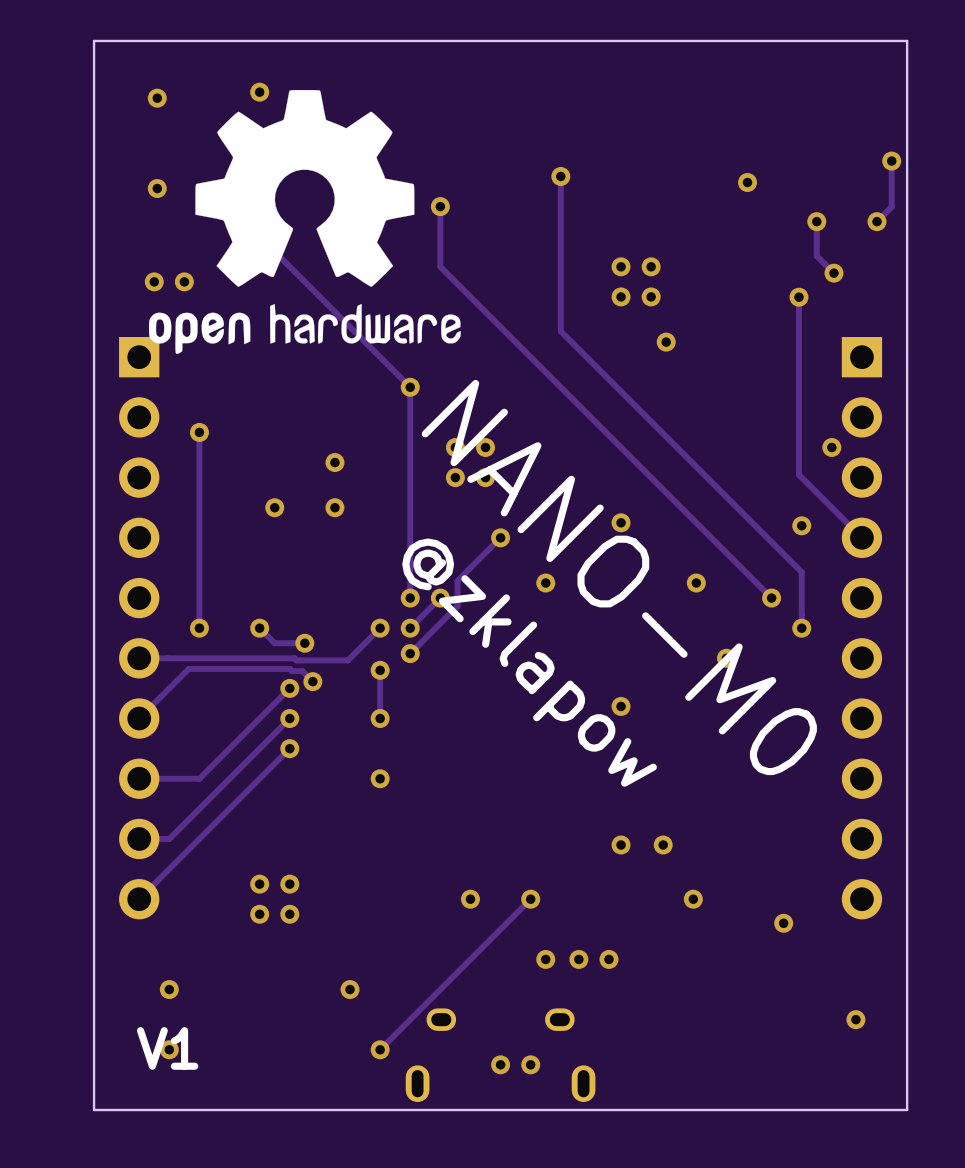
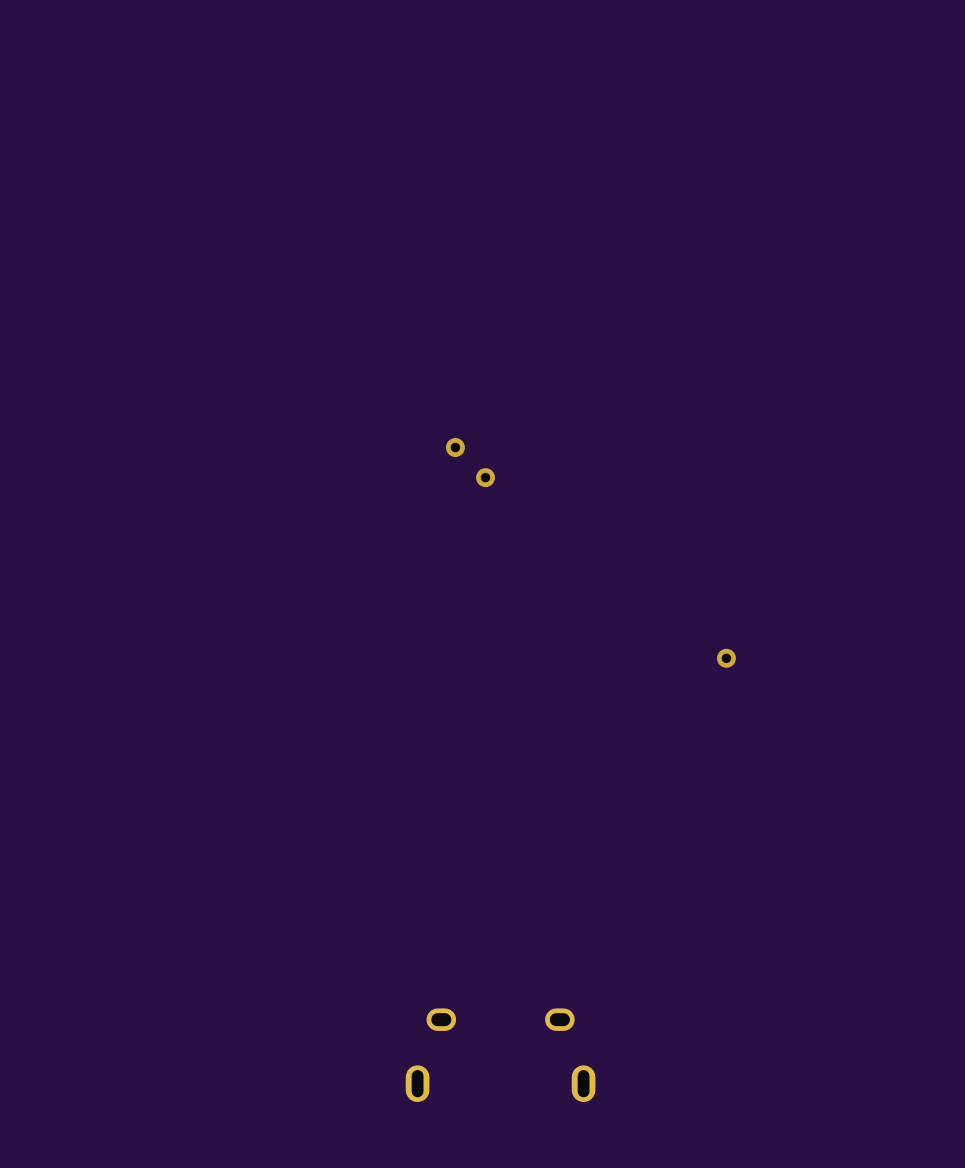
board edge: (907, 40) (94, 40) (94, 1110) (907, 1110) (907, 40) -> none
drawing: [148, 89, 461, 354] -> none
via: (259, 92) -> none
via: (157, 98) -> none
track: (891, 161) (891, 206) (877, 221) -> none
via: (891, 161) -> none
track: (560, 176) (560, 331) (801, 572) (801, 628) -> none
via: (560, 176) -> none
via: (747, 182) -> none
via: (157, 188) -> none
track: (440, 206) (440, 266) (771, 598) -> none
via: (440, 206) -> none
track: (816, 221) (816, 255) (833, 273) -> none
via: (816, 221) -> none
via: (877, 221) -> none
track: (259, 236) (410, 387) (410, 598) -> none
via: (621, 266) -> none
via: (651, 266) -> none
via: (833, 273) -> none
via: (154, 281) -> none
via: (184, 281) -> none
via: (621, 296) -> none
via: (651, 296) -> none
track: (798, 297) (798, 474) (861, 537) -> none
via: (798, 297) -> none
via: (666, 342) -> none
via: (410, 387) -> none
track: (199, 432) (199, 628) -> none
via: (199, 432) -> none
via: (485, 447) -> none
via: (831, 447) -> none
via: (334, 462) -> none
via: (455, 477) -> none
via: (274, 507) -> none
via: (334, 507) -> none
via: (621, 522) -> none
via: (801, 525) -> none
track: (500, 537) (457, 580) (457, 606) (410, 653) -> none
via: (500, 537) -> none
text: NANO-M0 (619, 577) -> none
via: (545, 583) -> none
via: (696, 583) -> none
via: (410, 598) -> none
track: (440, 598) (410, 628) -> none
via: (440, 598) -> none
via: (771, 598) -> none
part: (139, 628) -> none
via: (199, 628) -> none
track: (259, 628) (274, 643) (304, 643) -> none
via: (259, 628) -> none
track: (380, 628) (347, 660) (296, 660) (294, 658) (139, 658) -> none
via: (380, 628) -> none
via: (410, 628) -> none
via: (801, 628) -> none
part: (861, 628) -> none
via: (304, 643) -> none
via: (410, 653) -> none
text: @zklapow (529, 662) -> none
track: (380, 670) (380, 718) -> none
via: (380, 670) -> none
track: (312, 681) (302, 671) (292, 671) (290, 668) (188, 668) (139, 718) -> none
via: (312, 681) -> none
track: (289, 688) (199, 778) (139, 778) -> none
via: (289, 688) -> none
via: (621, 706) -> none
track: (289, 718) (169, 838) (139, 838) -> none
via: (289, 718) -> none
via: (380, 718) -> none
track: (289, 748) (139, 899) -> none
via: (289, 748) -> none
via: (380, 778) -> none
via: (621, 845) -> none
via: (663, 845) -> none
via: (259, 884) -> none
via: (289, 884) -> none
via: (470, 899) -> none
track: (530, 899) (380, 1049) -> none
via: (530, 899) -> none
via: (693, 899) -> none
via: (259, 914) -> none
via: (289, 914) -> none
via: (783, 923) -> none
via: (545, 959) -> none
via: (578, 959) -> none
via: (609, 959) -> none
via: (169, 989) -> none
via: (350, 989) -> none
via: (855, 1019) -> none
text: V1 (167, 1048) -> none
via: (169, 1049) -> none
via: (380, 1049) -> none
via: (500, 1064) -> none
via: (530, 1064) -> none

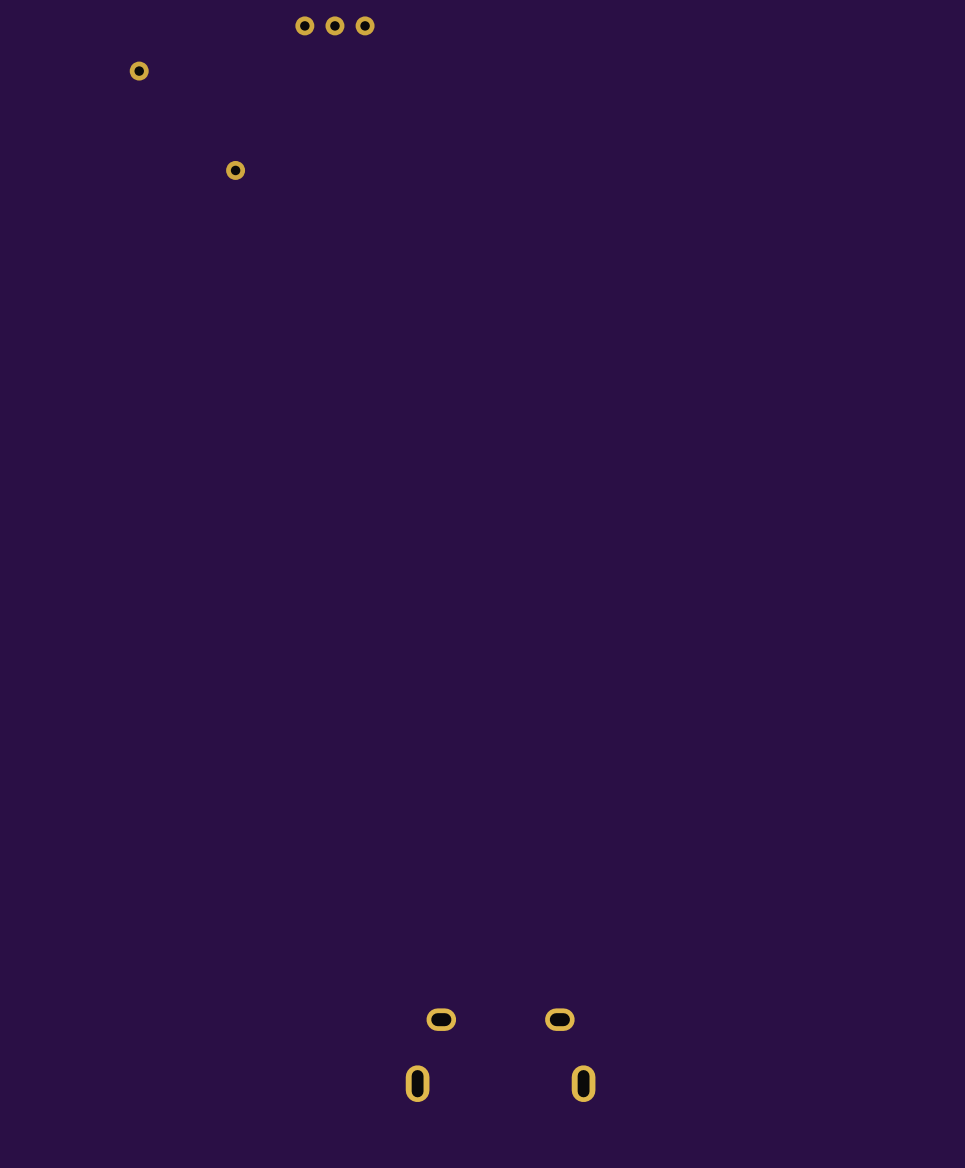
via: none -> (304, 25)
via: none -> (334, 25)
via: none -> (365, 25)
via: none -> (139, 71)
via: none -> (235, 170)
via: (455, 447) -> none
via: (485, 477) -> none
via: (726, 658) -> none

